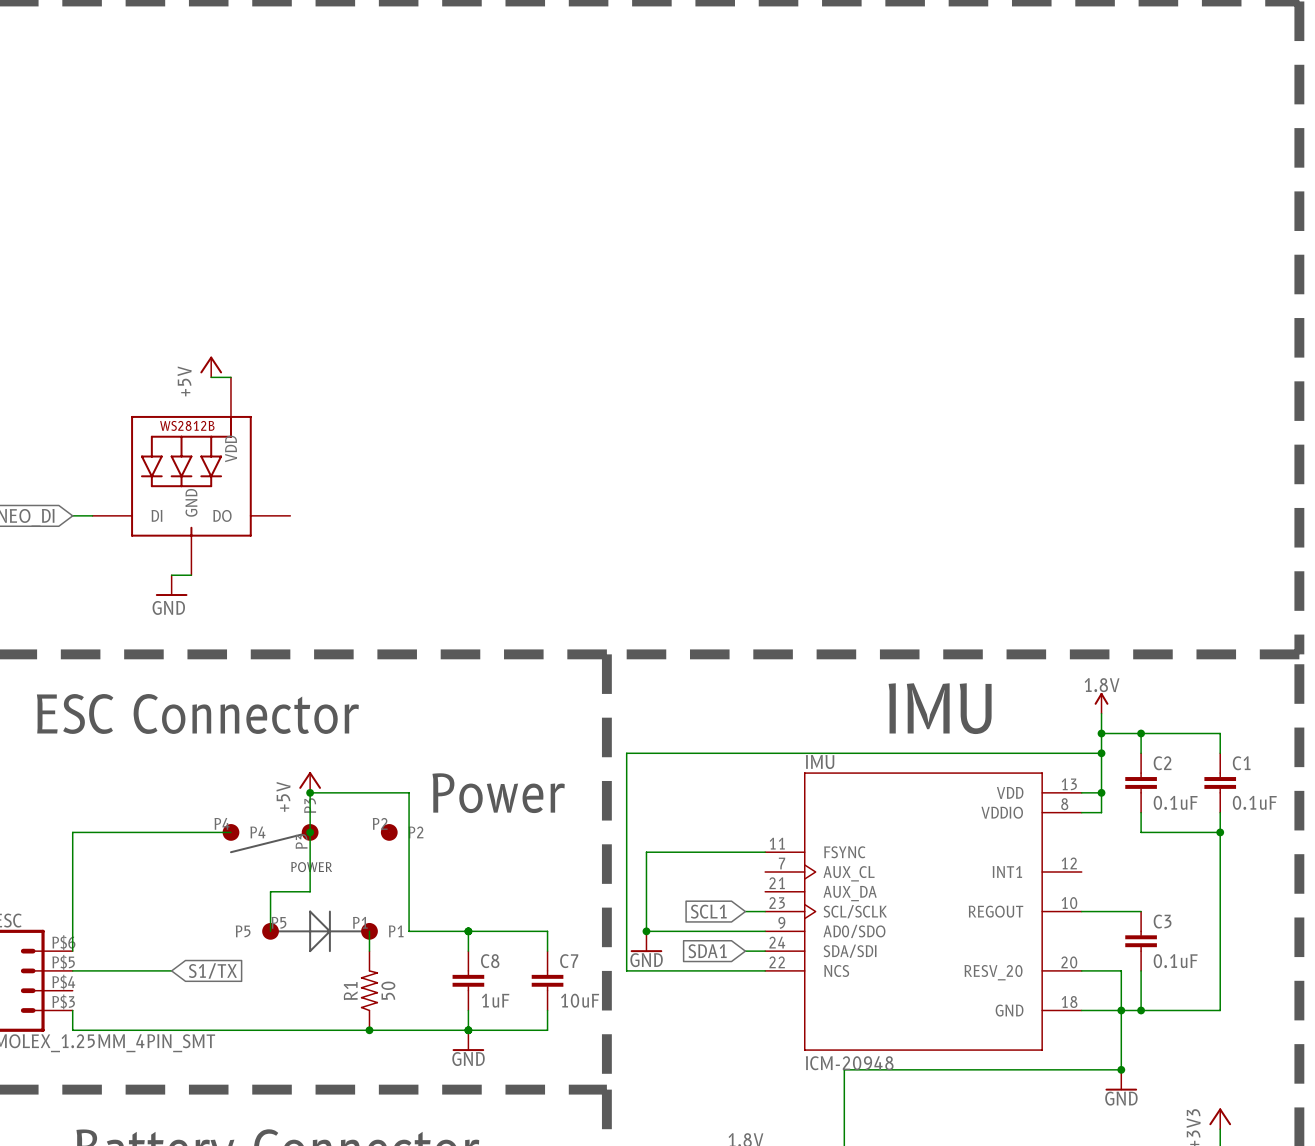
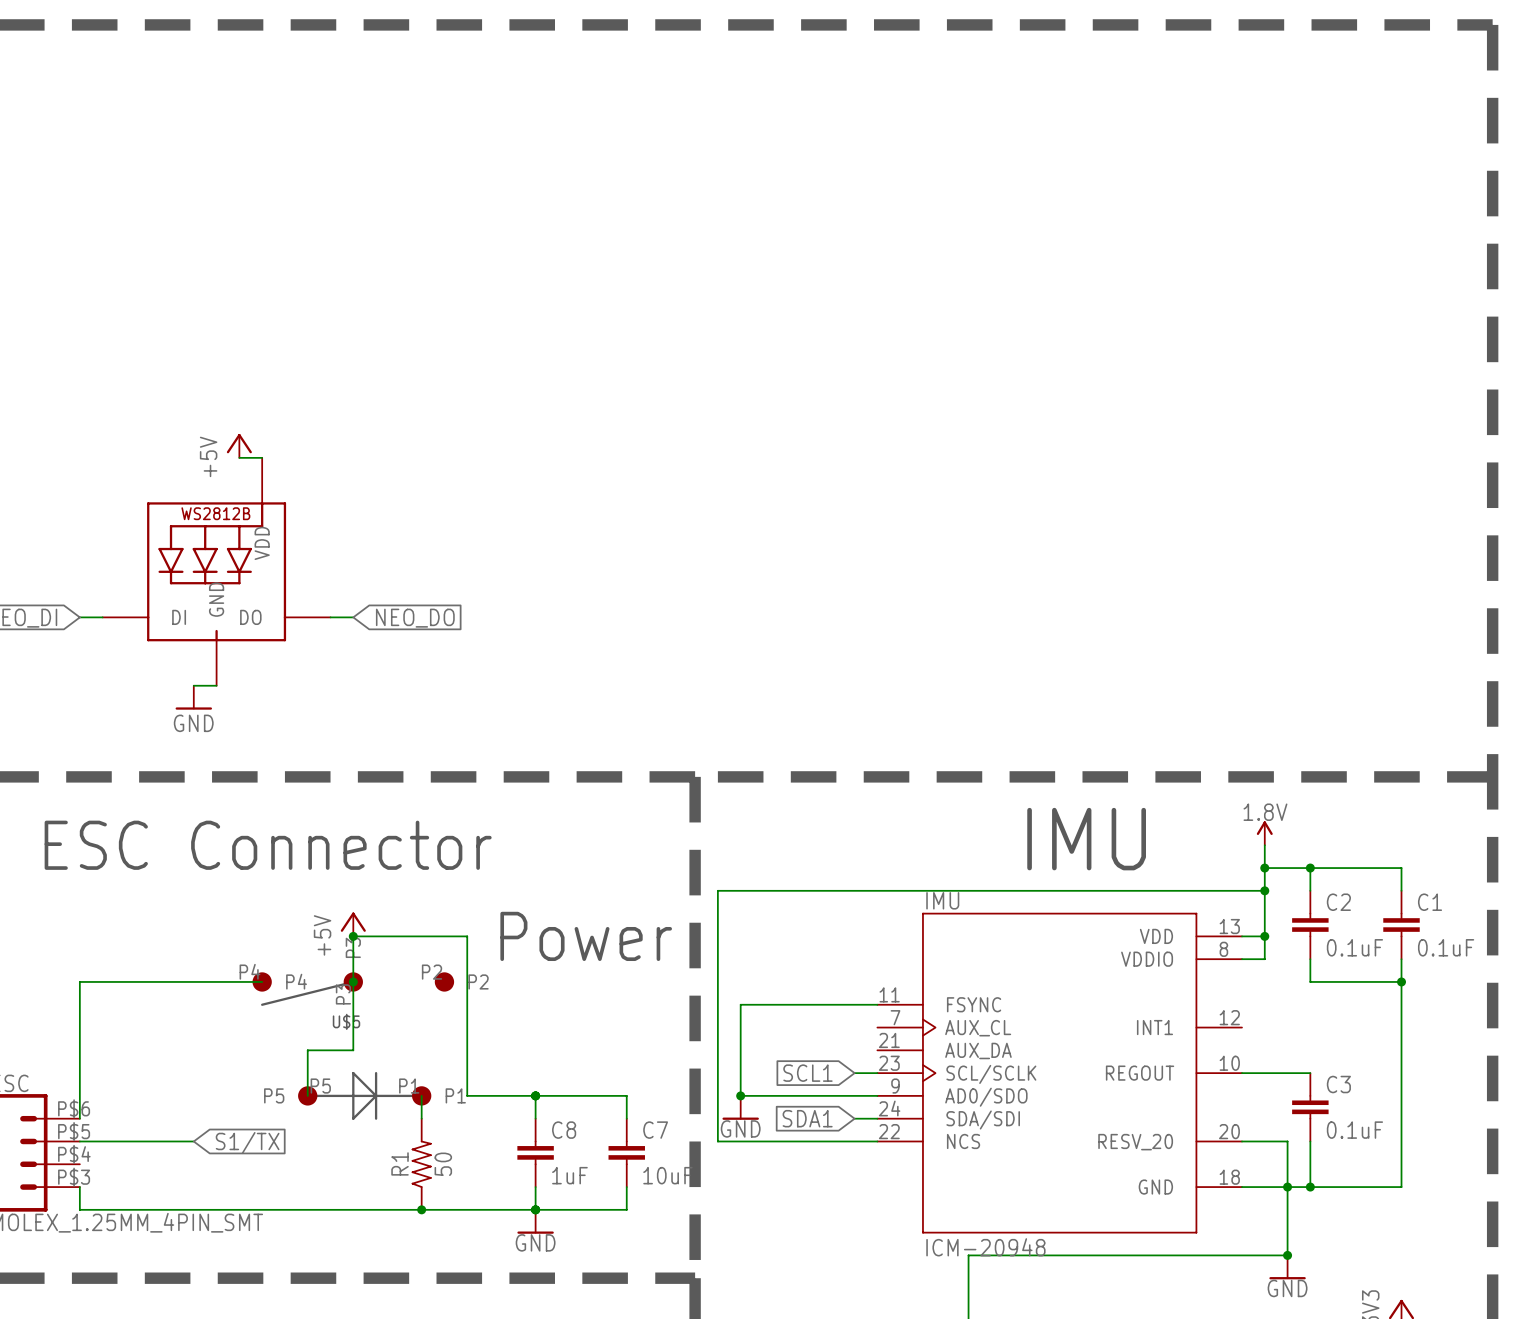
wire: none -> (330, 617) (353, 617)
global label: none -> NEO_DO (415, 618)
POWER name: POWER (311, 867) -> U$5 (346, 1021)

